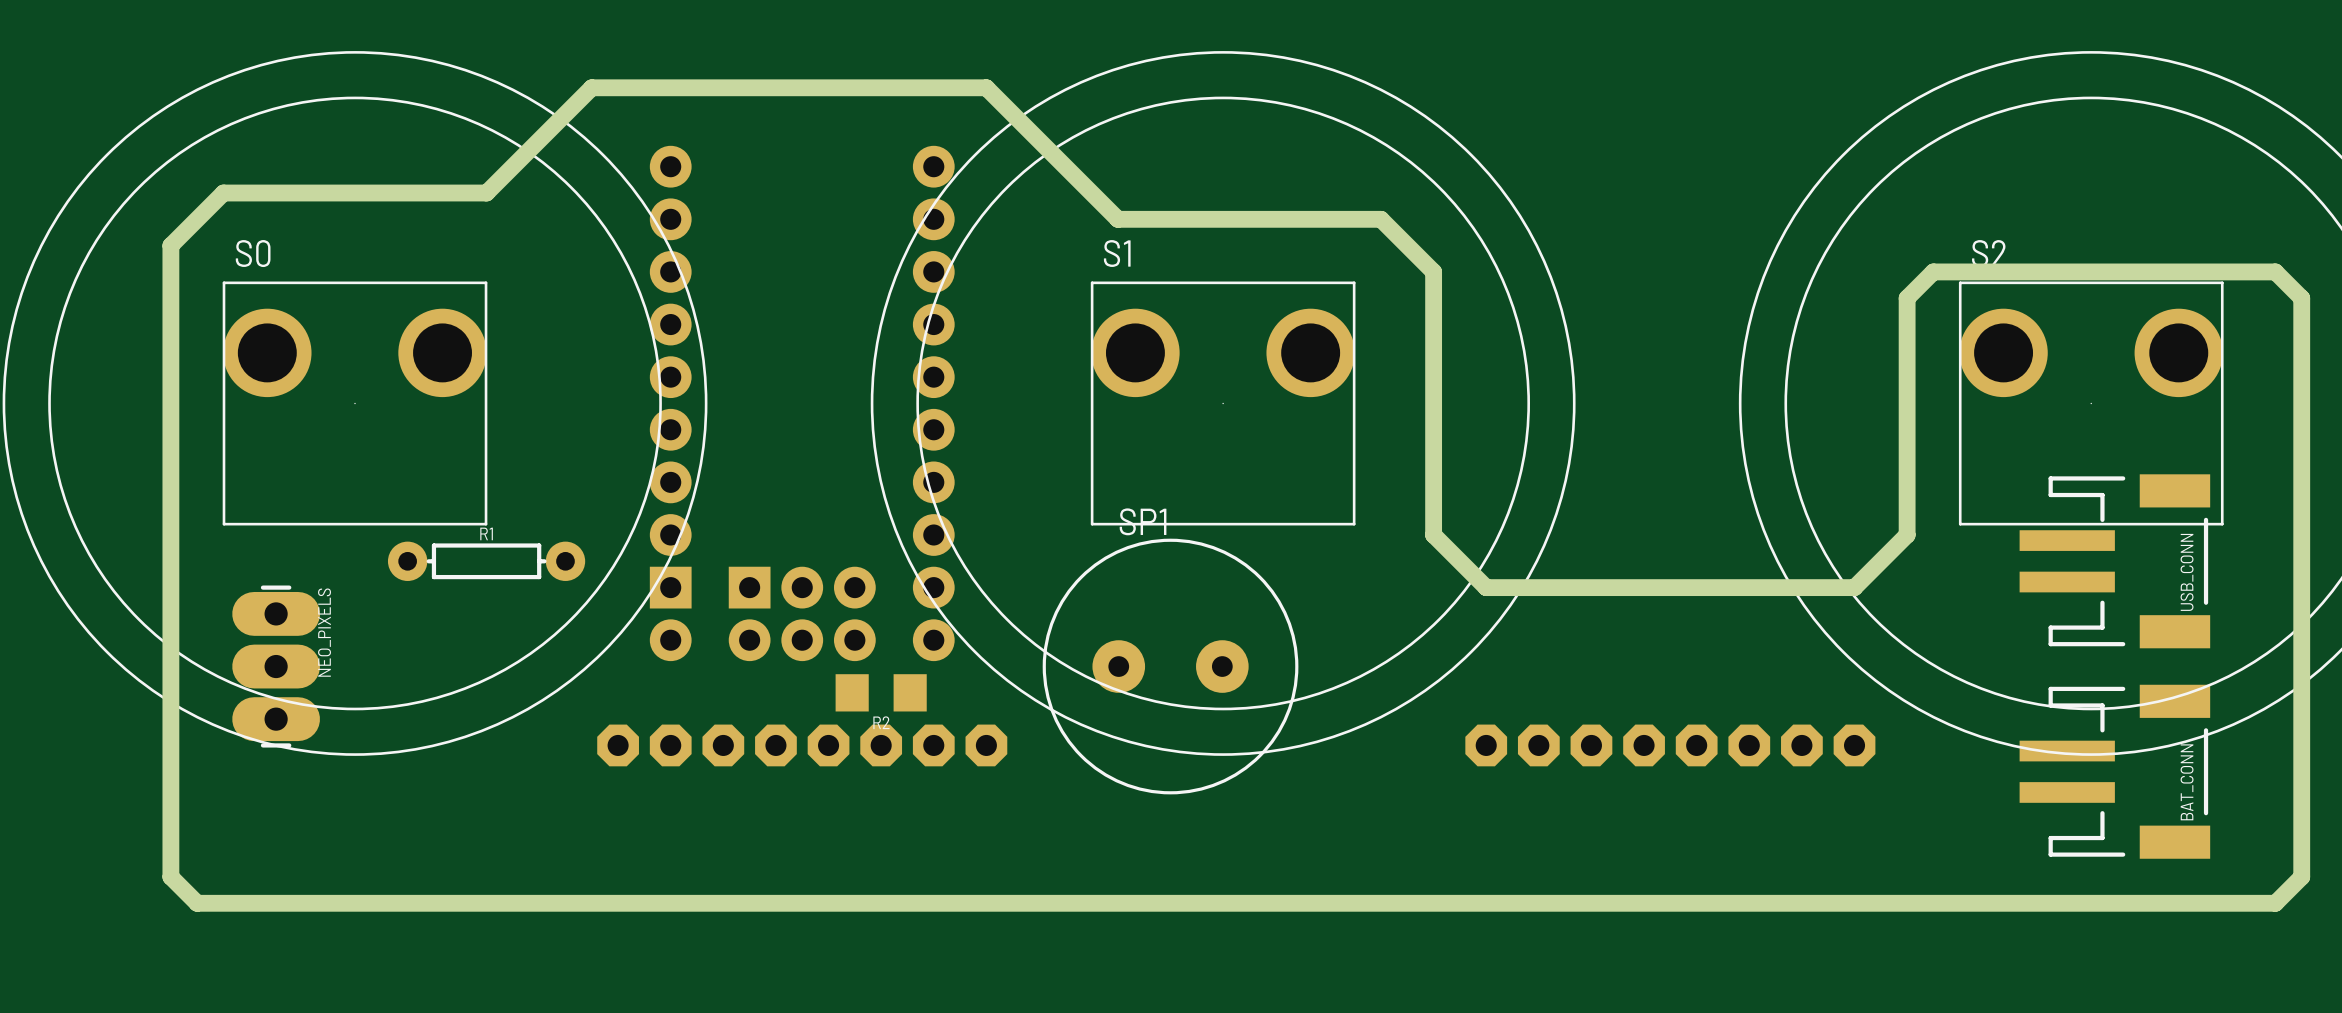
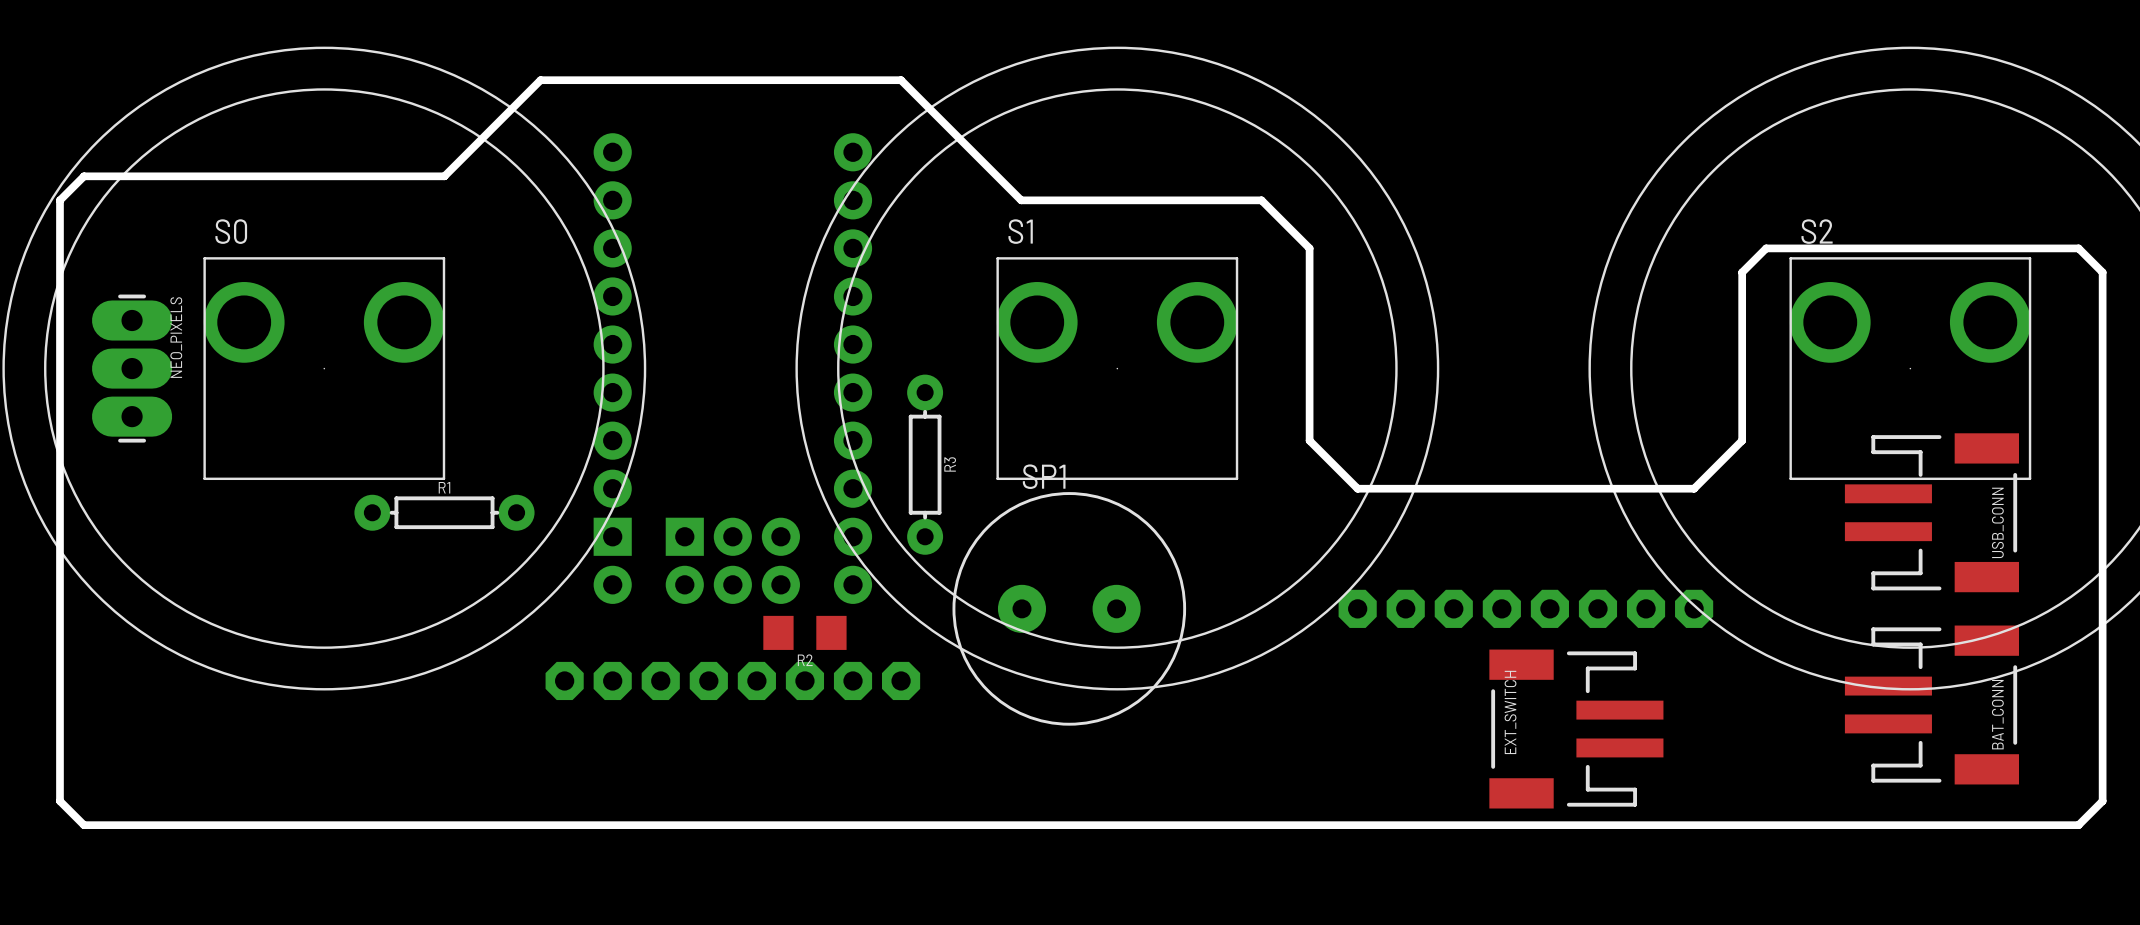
board edge: (223, 193) (170, 245) (170, 876) (197, 903) -> (204, 176) (84, 176) (59, 200) (59, 801) (84, 825) (180, 825)
board edge width: thick (223, 193) (486, 193) (591, 87) (986, 87) (1117, 219) (1380, 219) (1433, 271) (1433, 482) -> thin (204, 176) (444, 176) (540, 80) (901, 80) (1021, 200) (1261, 200) (1309, 248) (1309, 440)
board edge: (1433, 482) (1433, 534) (1486, 587) (1854, 587) (1907, 534) (1907, 482) -> (1309, 440) (1357, 488) (1694, 488) (1742, 440)
board edge width: thick (1907, 482) (1907, 298) (1933, 271) (2275, 271) (2301, 298) (2301, 876) (2275, 903) (197, 903) -> thin (1742, 440) (1742, 272) (1766, 248) (2078, 248) (2102, 272) (2102, 801) (2078, 825) (180, 825)
R3: none -> (925, 464)
NEO_PIXELS position: (276, 666) -> (132, 368)
part position: (1670, 745) -> (1525, 608)
EXT_SWITCH: none -> (1576, 729)

